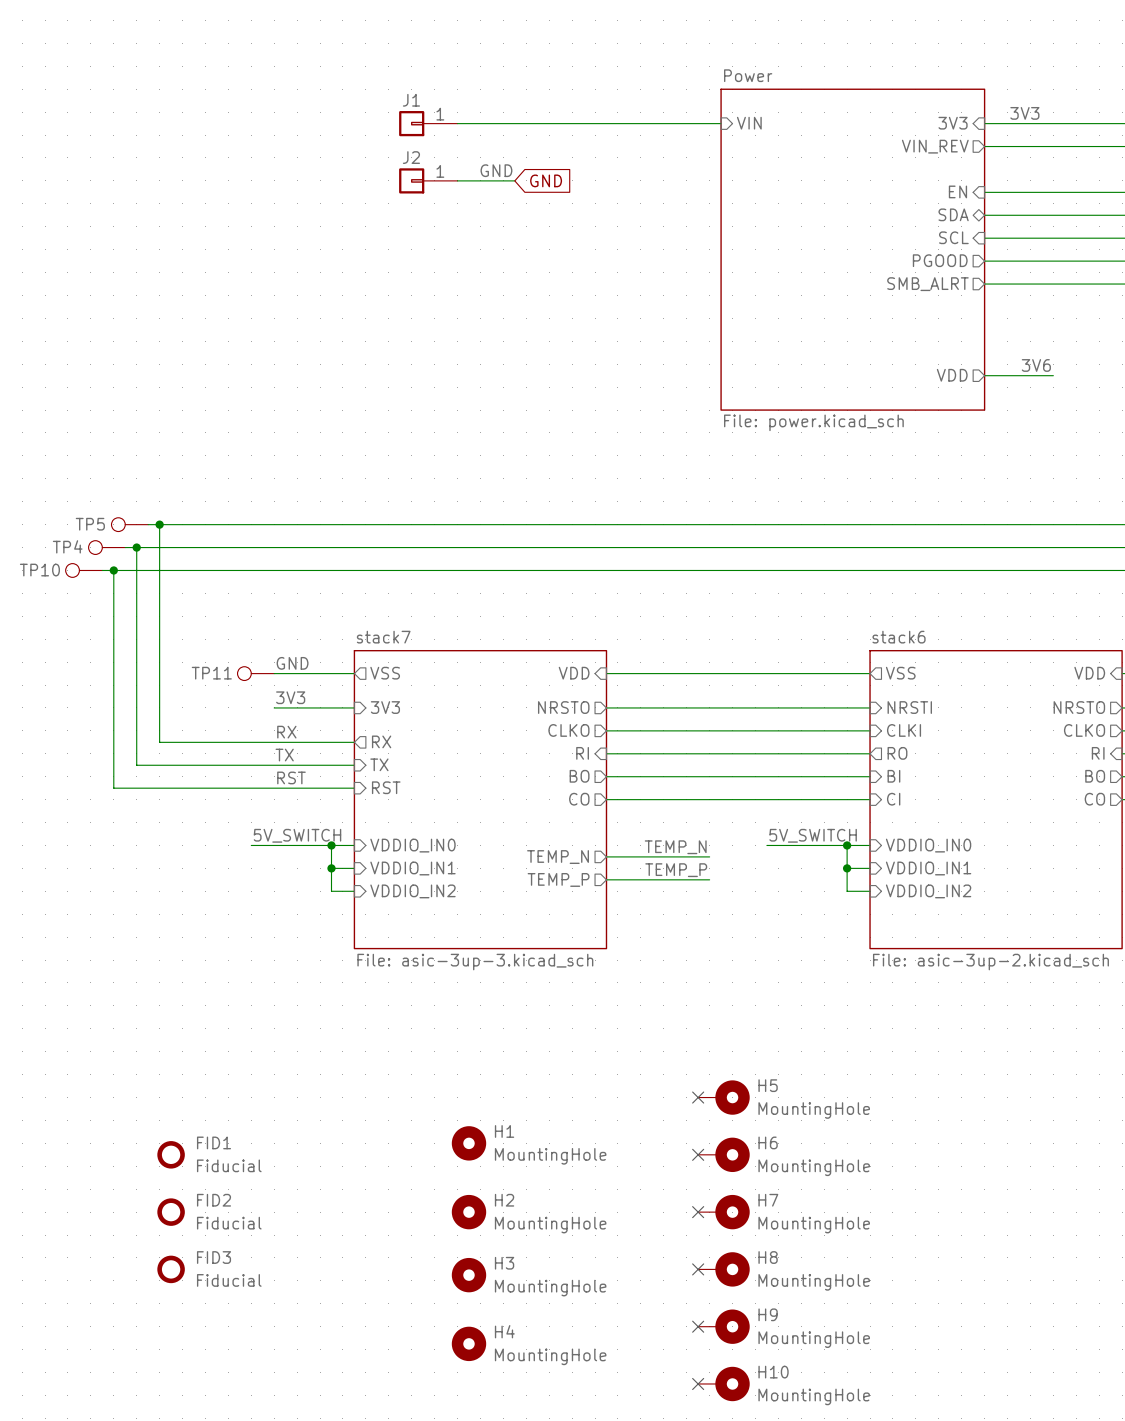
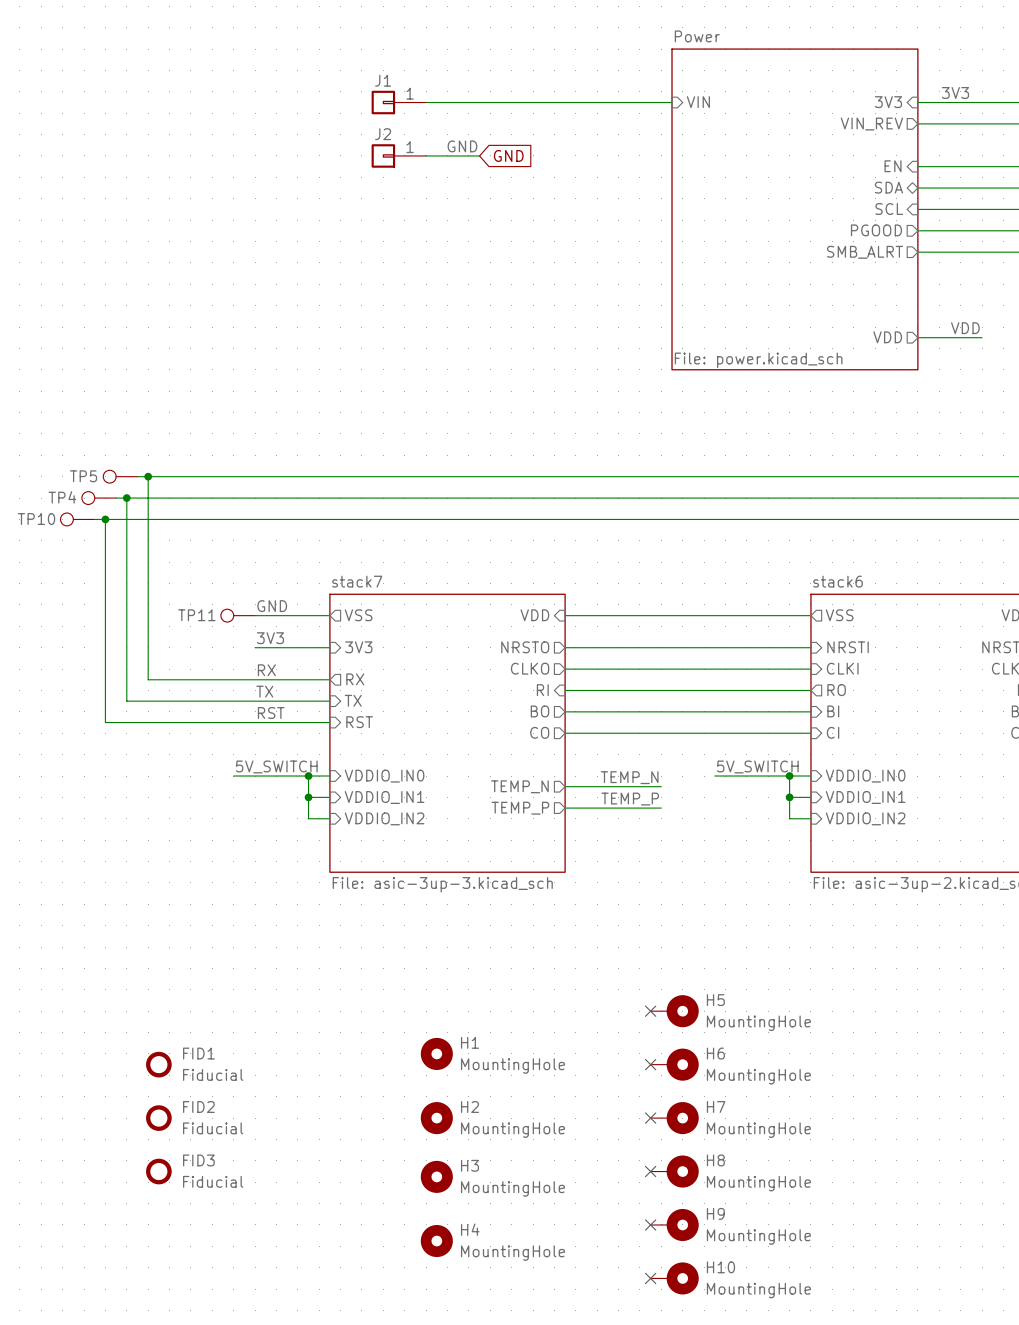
sheet Power: none -> File: power.kicad_sch (794, 209)
sheet Power: File: power.kicad_sch (852, 249) -> none
label: 3V6 (1036, 365) -> VDD (965, 328)

